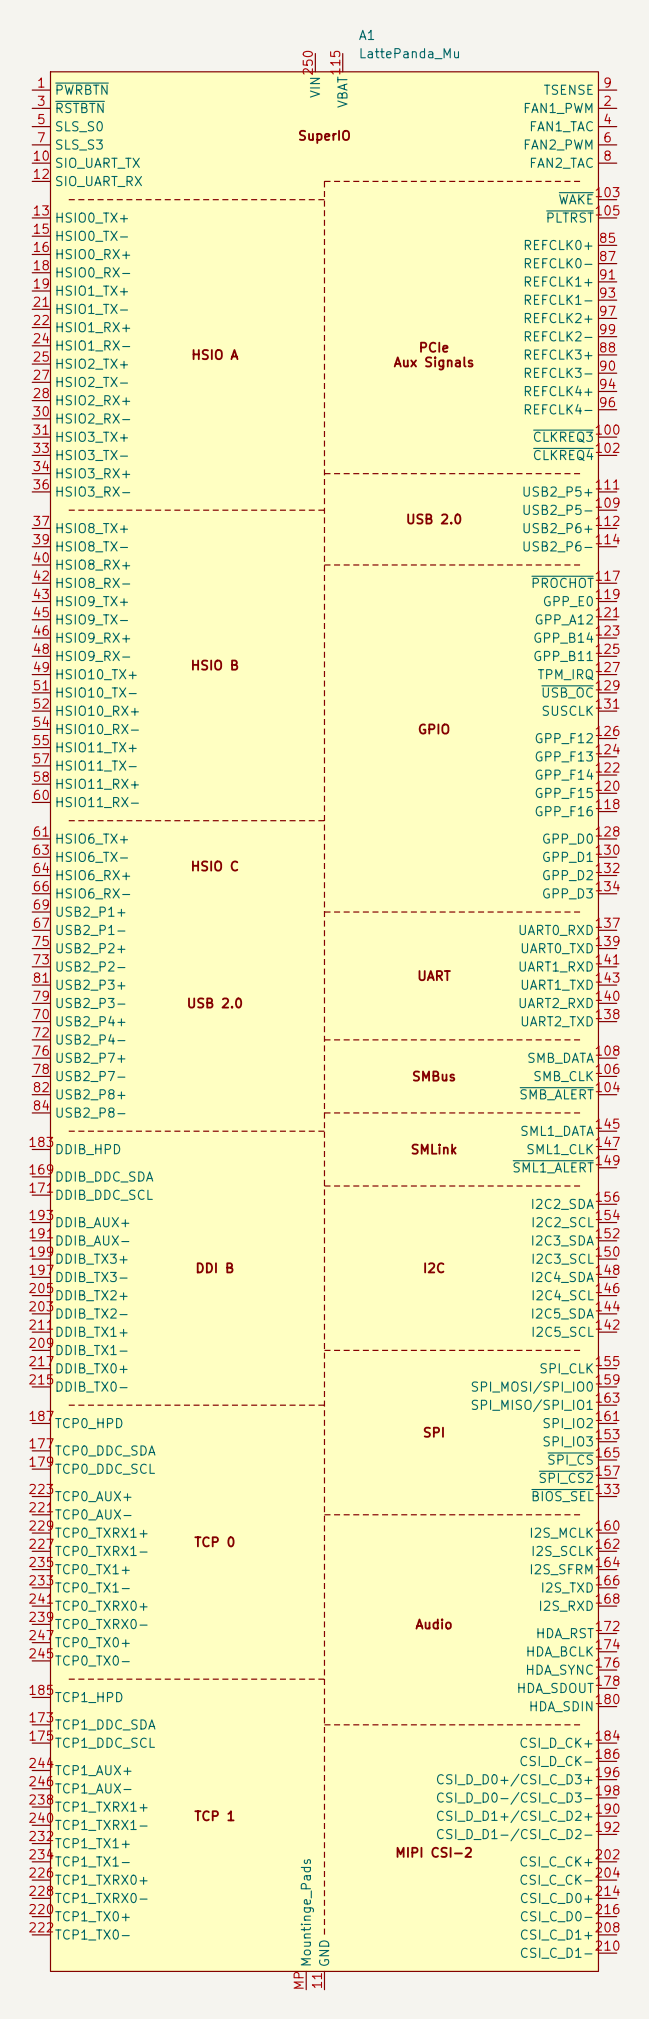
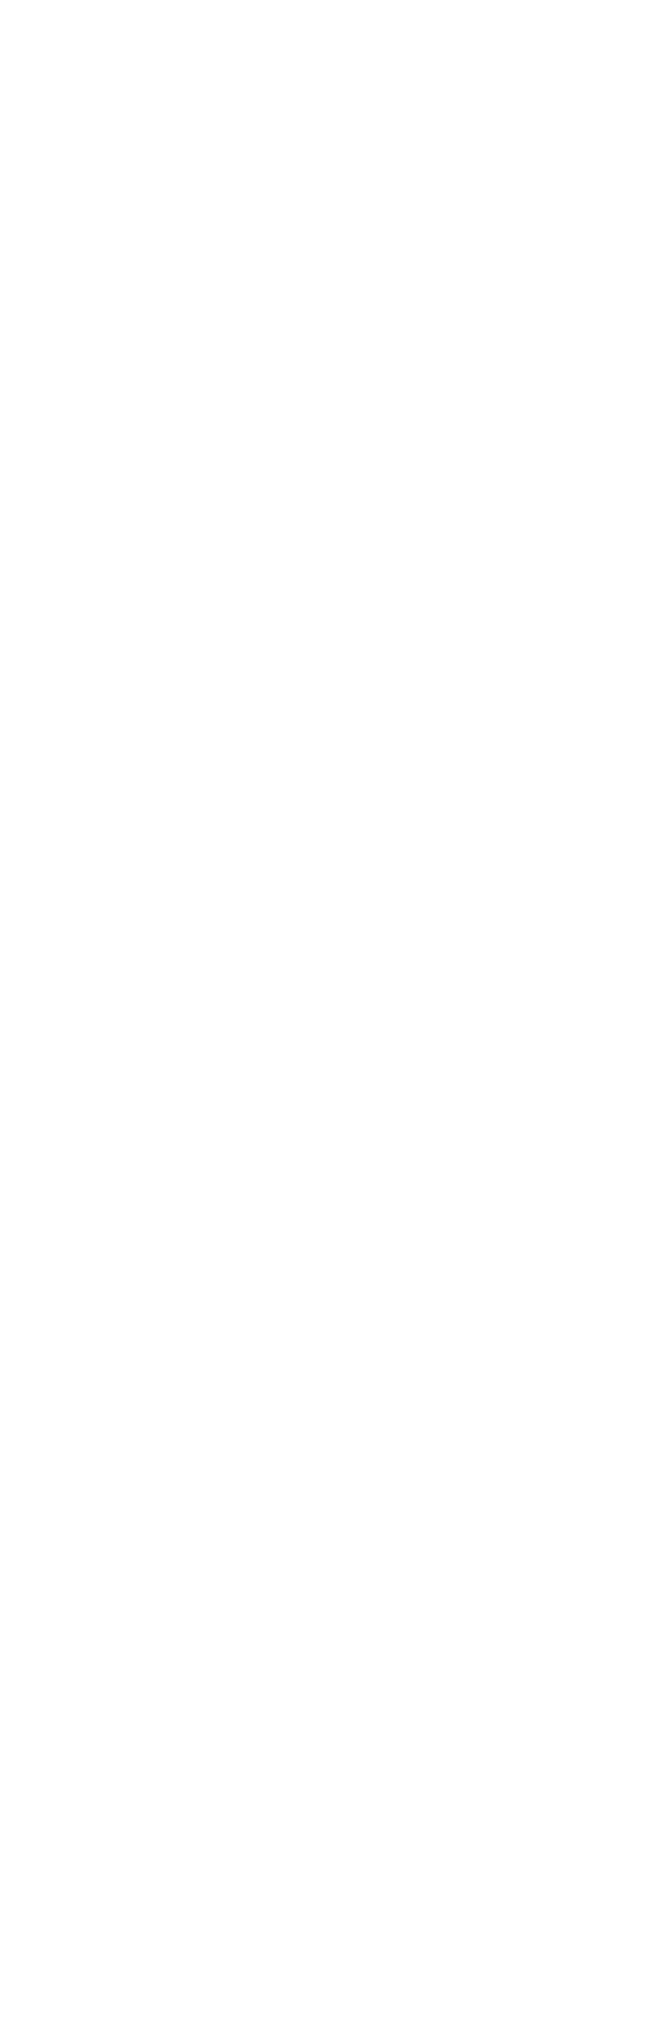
A1: LattePanda_Mu (324, 1021) -> none

